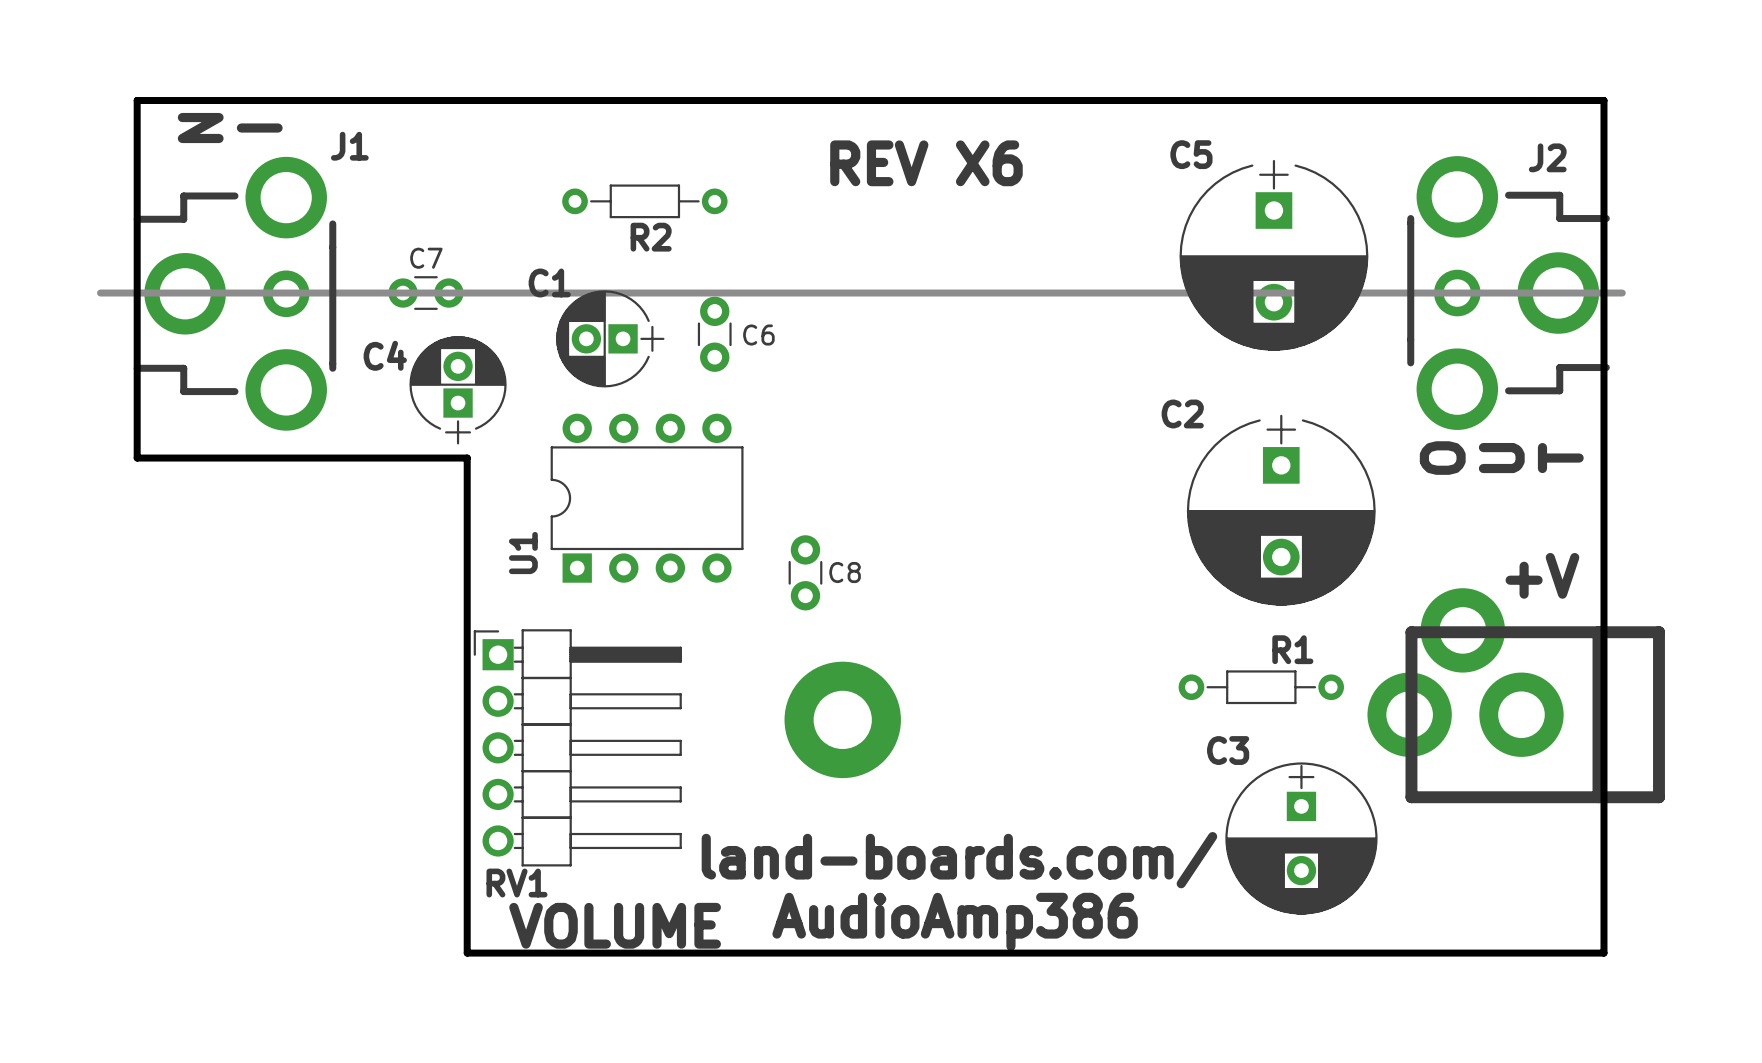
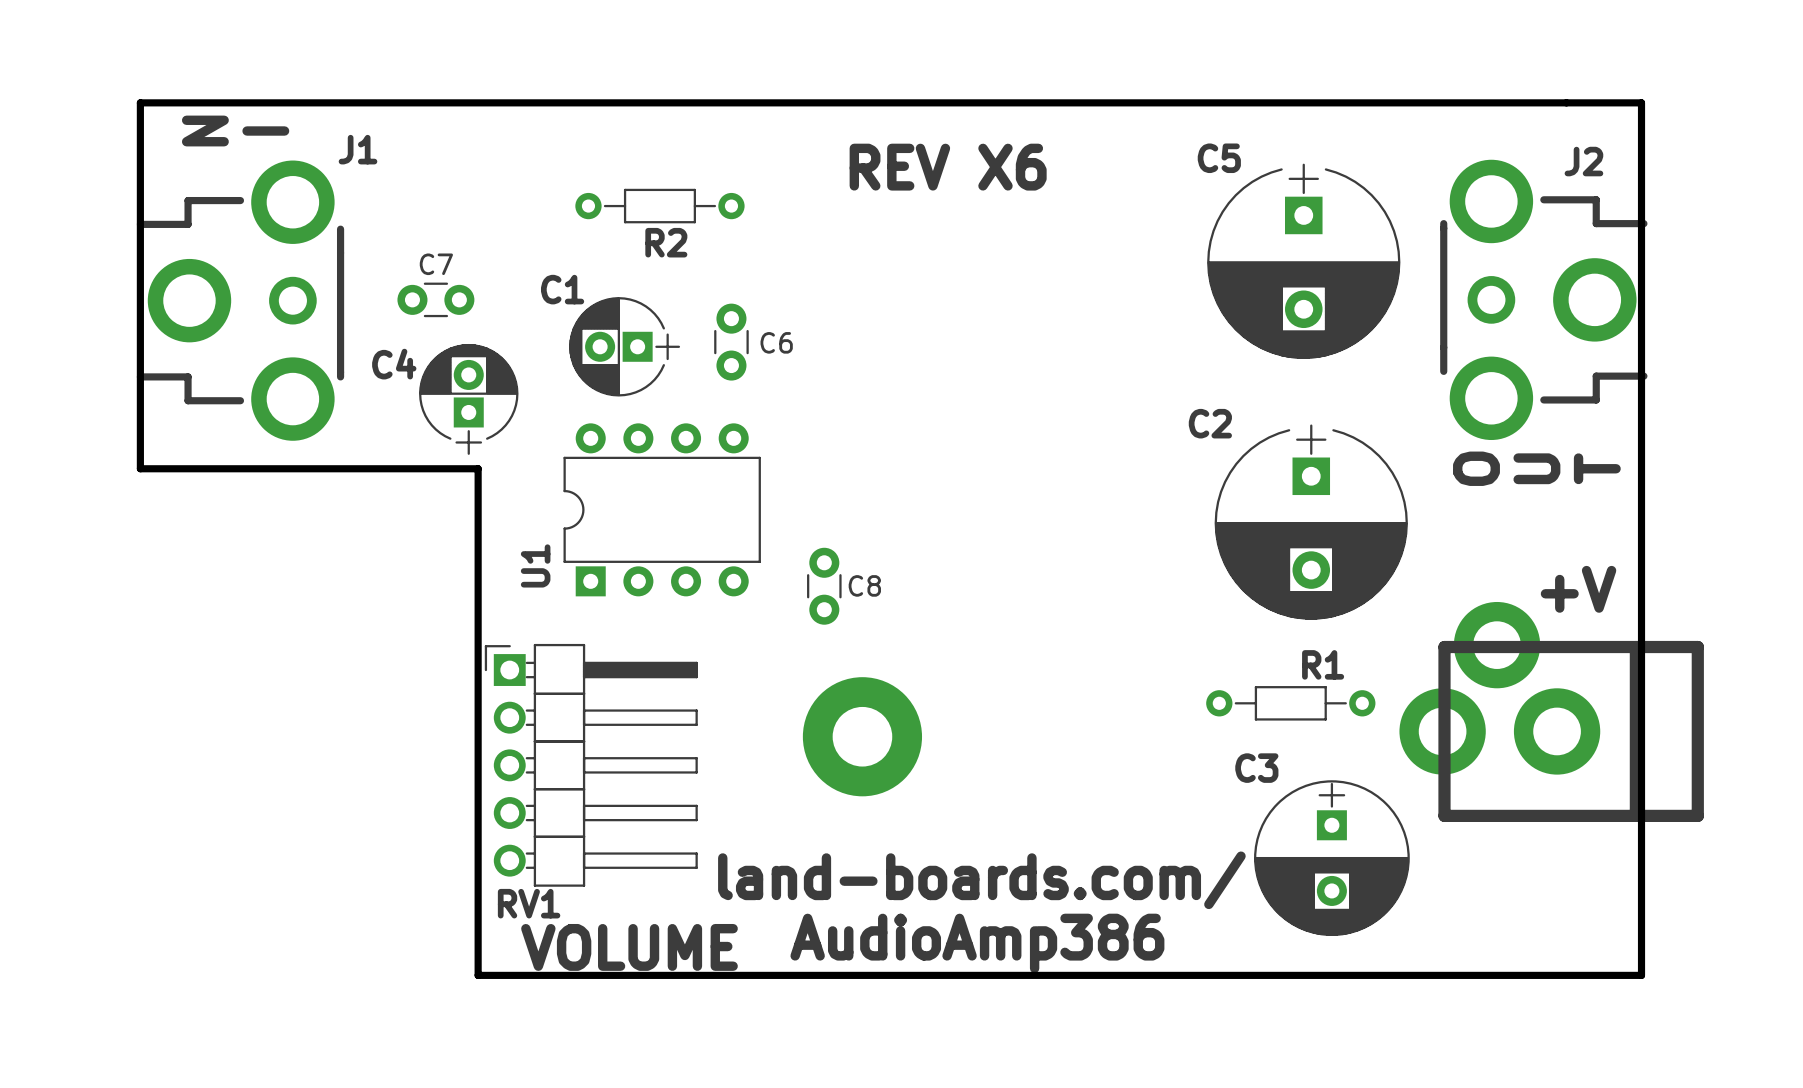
line: (100, 293) (1622, 293) -> none

